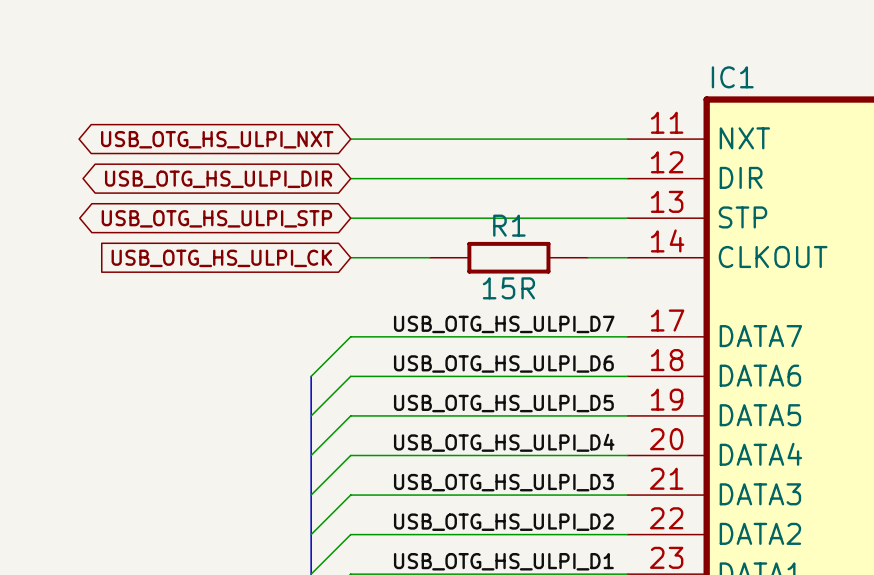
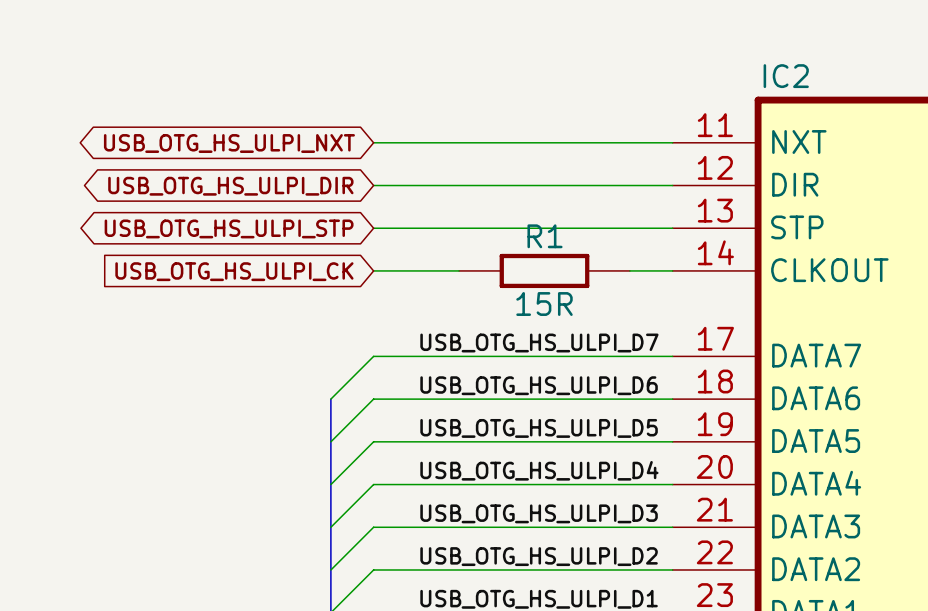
IC1 name: IC1 (732, 77) -> IC2 (786, 76)

